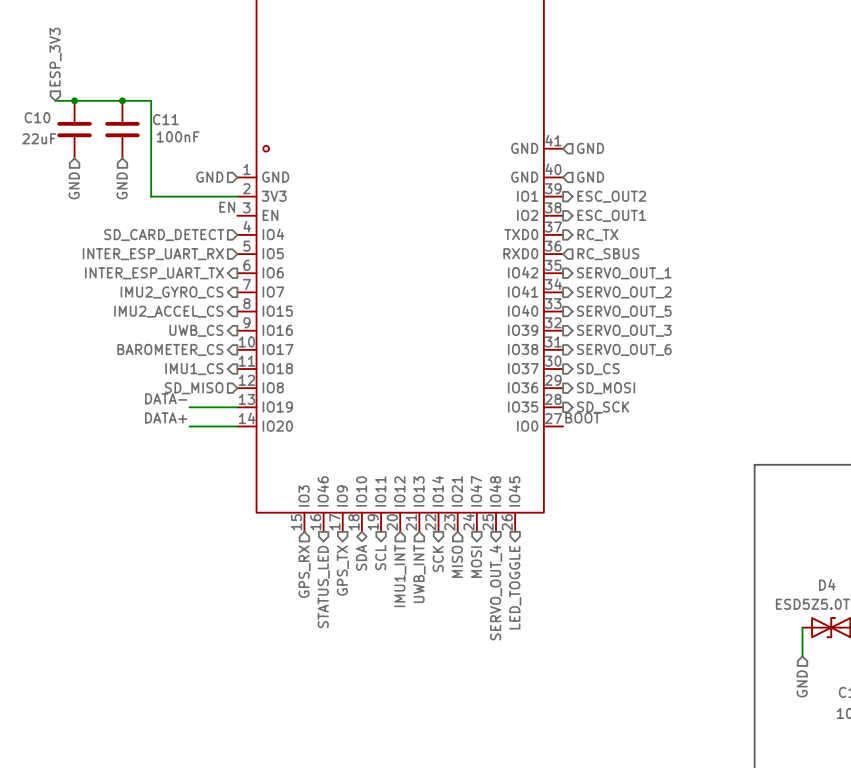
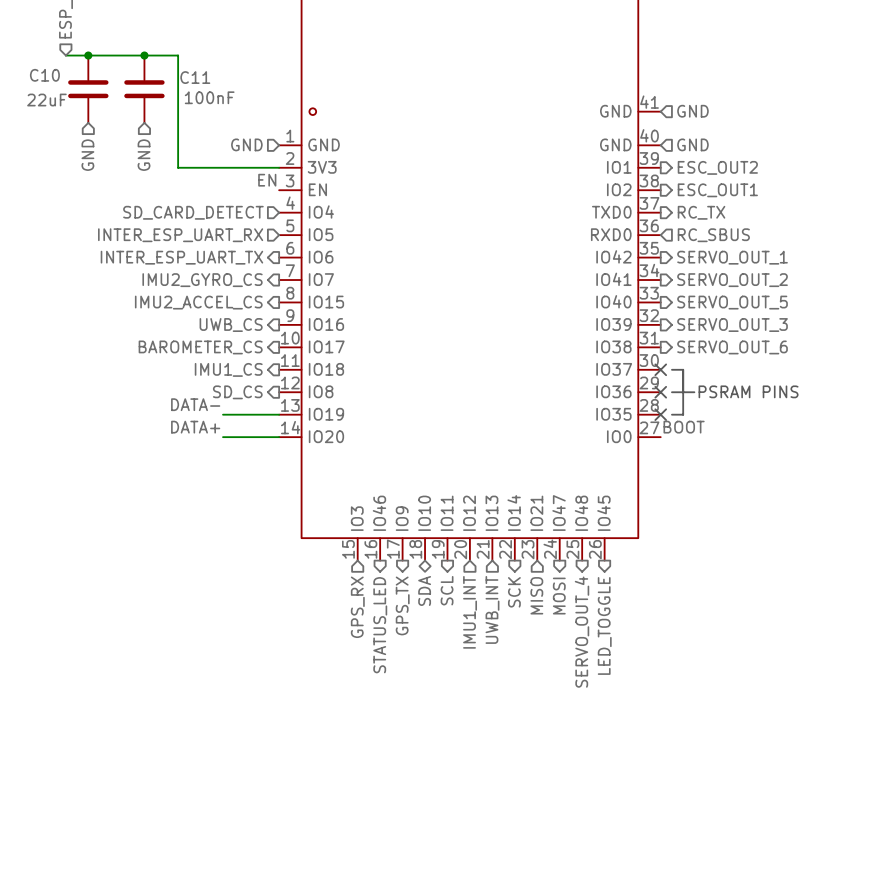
no-connect mark: none -> (660, 369)
line: none -> (671, 369) (683, 369) (683, 414) (671, 414)
hierarchical label: SD_CS (598, 369) -> none
text: none -> PSRAM PINS (748, 391)
hierarchical label shape: input (194, 388) -> output (237, 392)
hierarchical label: SD_MISO (194, 388) -> SD_CS (237, 392)
no-connect mark: none -> (660, 392)
line: none -> (671, 392) (694, 392)
hierarchical label: SD_MOSI (606, 388) -> none
no-connect mark: none -> (660, 414)
hierarchical label: SD_SCK (603, 407) -> none

